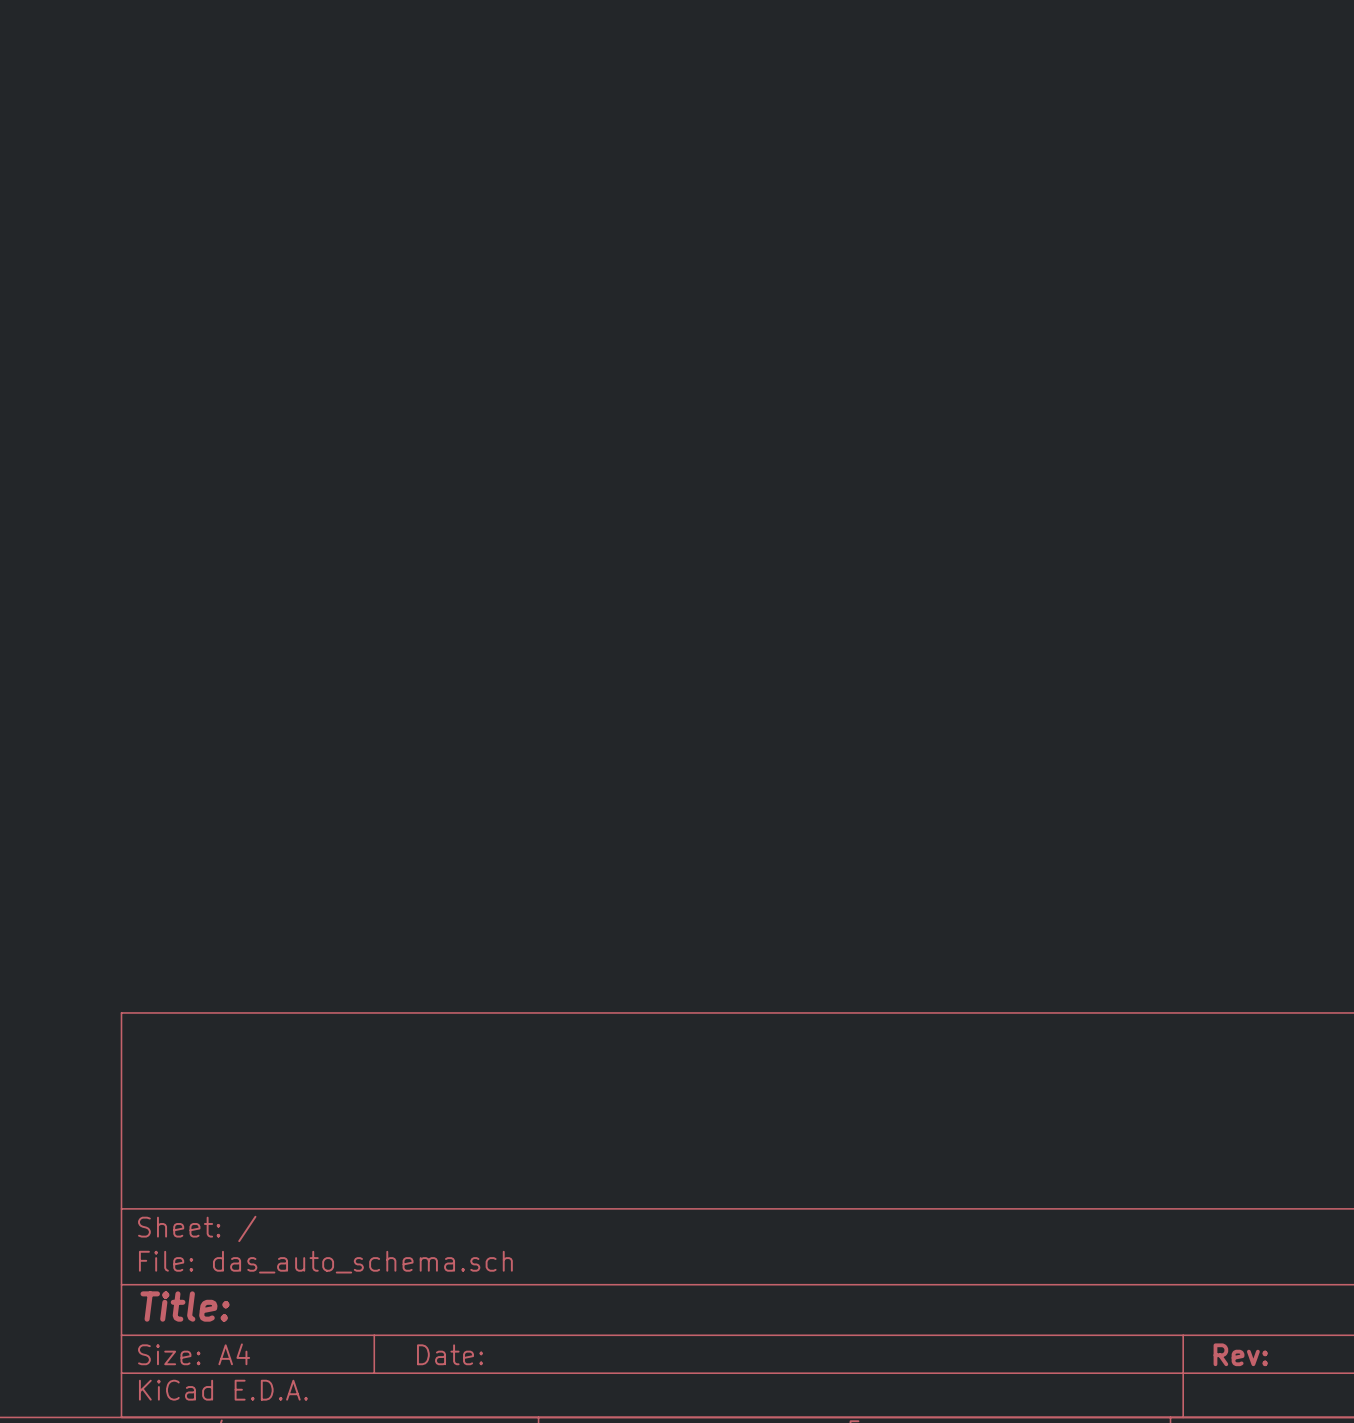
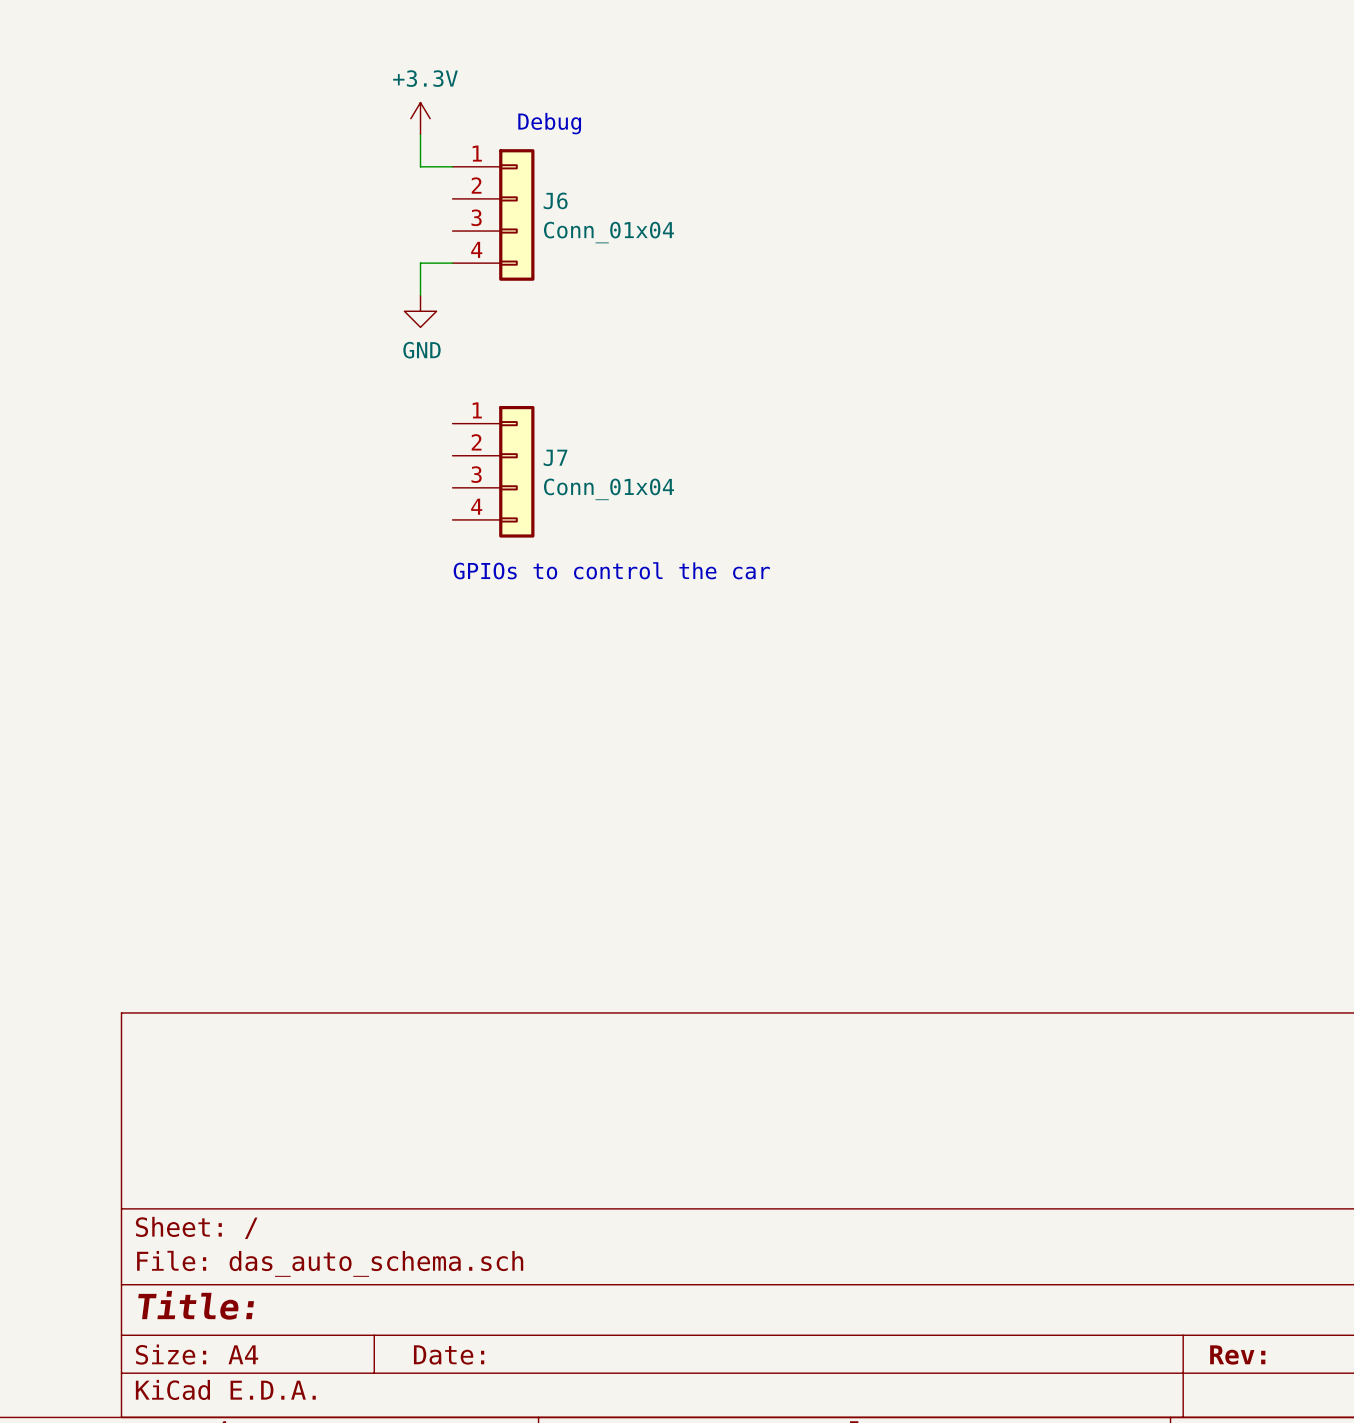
power symbol: none -> +3.3V (420, 118)
text: none -> Debug (549, 123)
wire: none -> (420, 134) (420, 166) (452, 166)
J6: none -> Conn_01x04 (493, 214)
wire: none -> (452, 263) (420, 263) (420, 295)
power symbol: none -> GND (420, 311)
J7: none -> Conn_01x04 (493, 471)
text: none -> GPIOs to control the car (611, 570)

